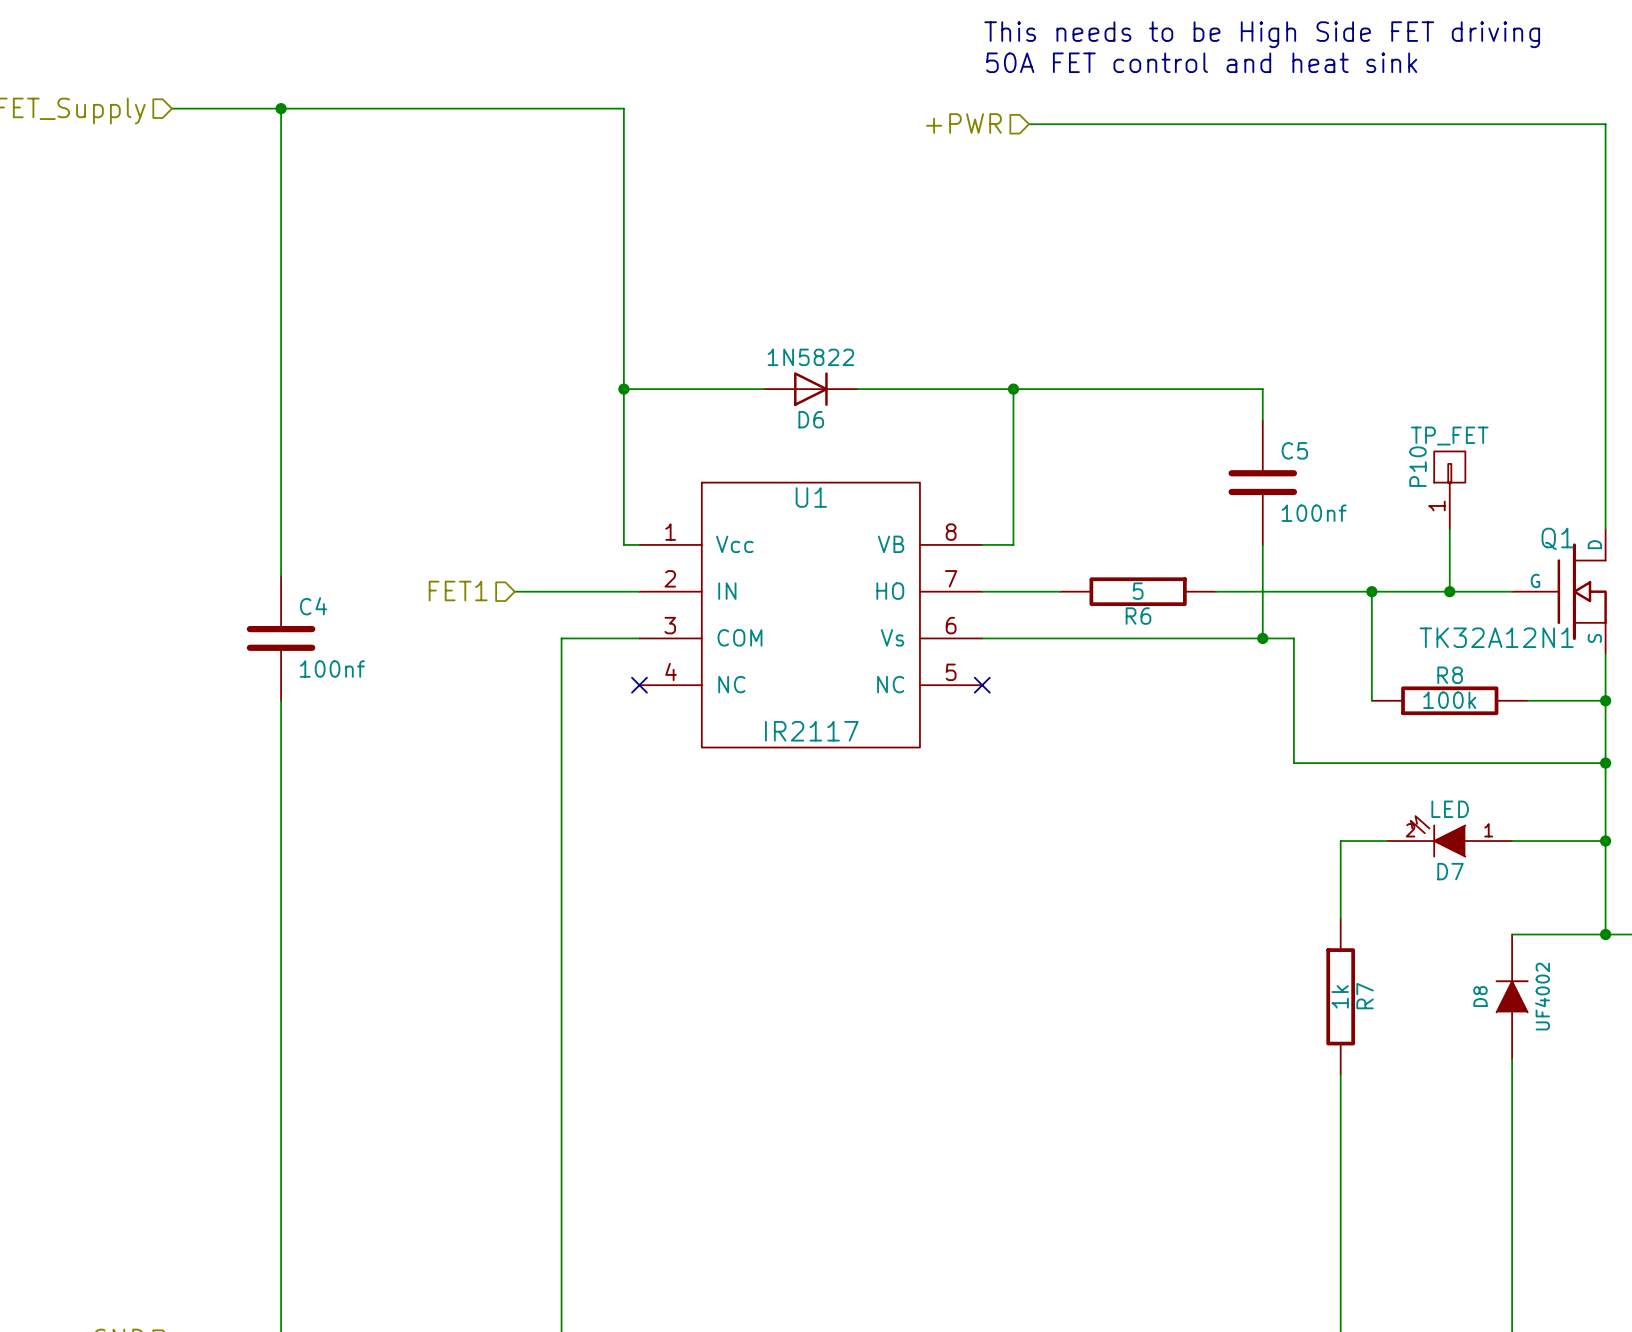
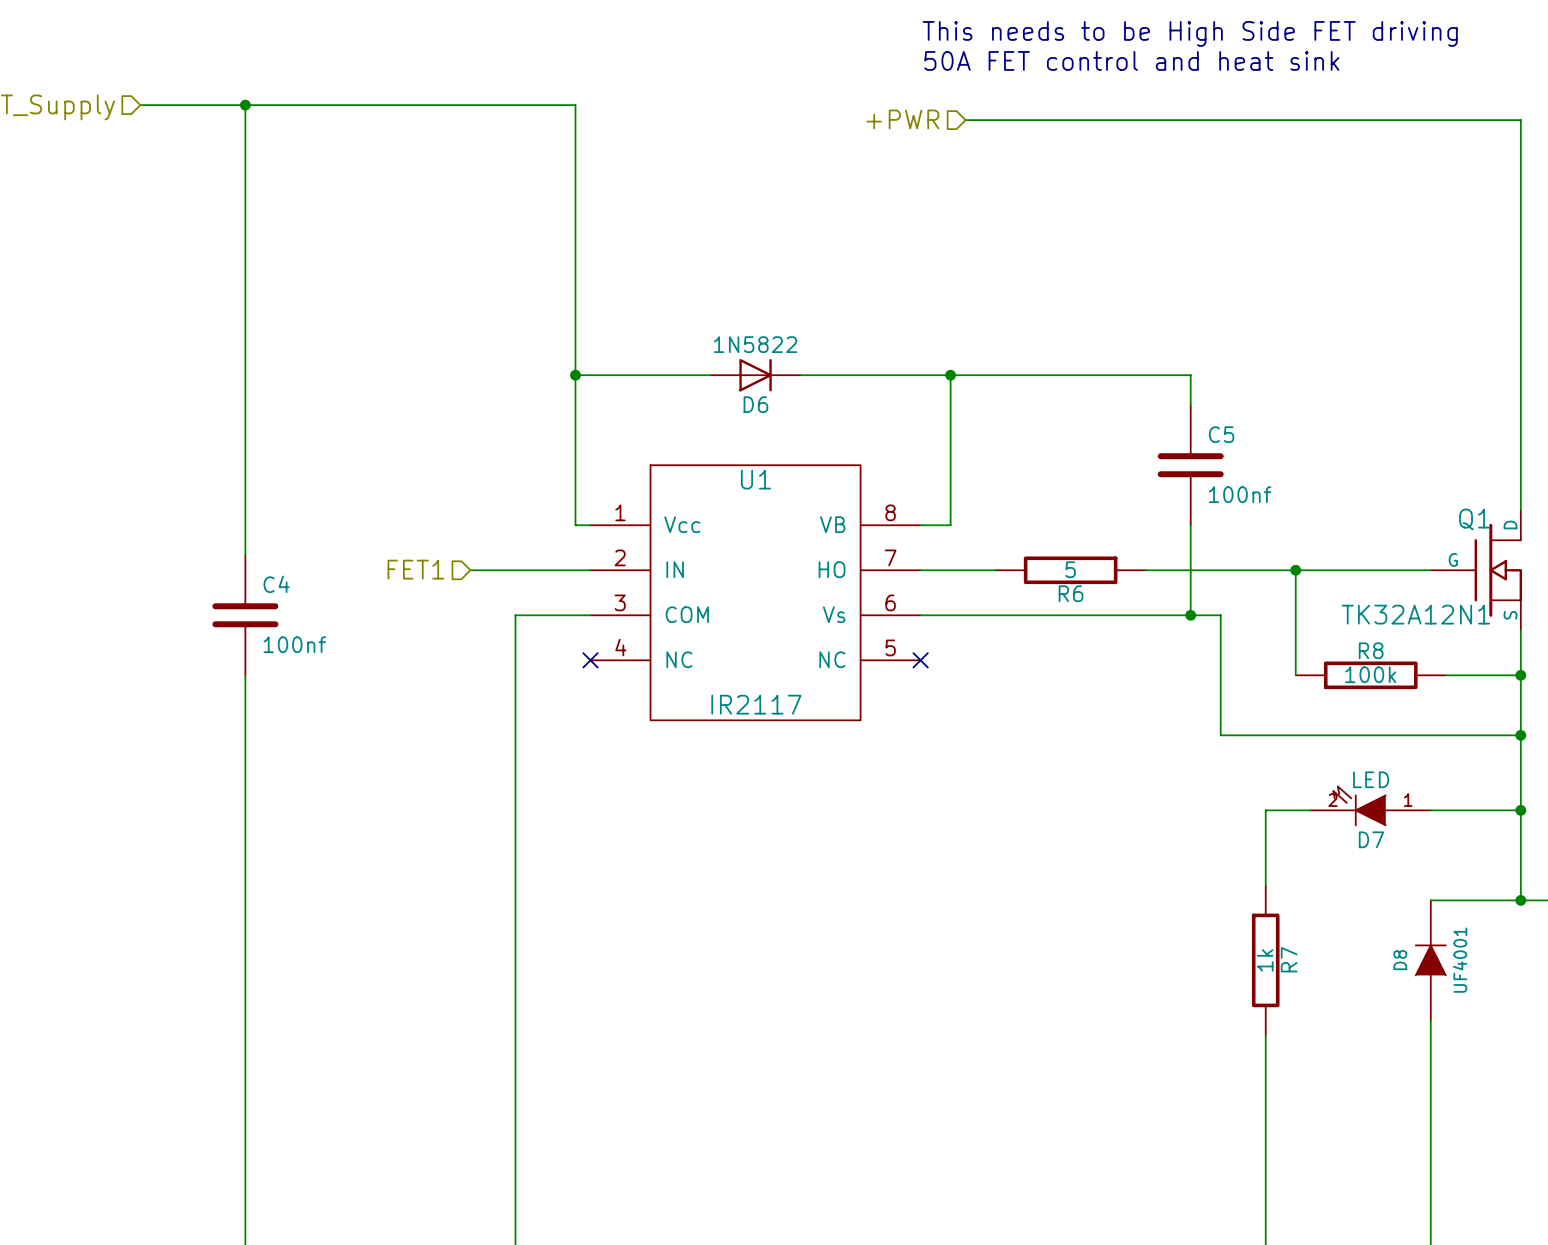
P10: TP_FET (1449, 490) -> none
wire: (1449, 529) (1449, 591) -> none
junction: (1449, 591) -> none
D8 value: UF4002 (1542, 996) -> UF4001 (1460, 960)

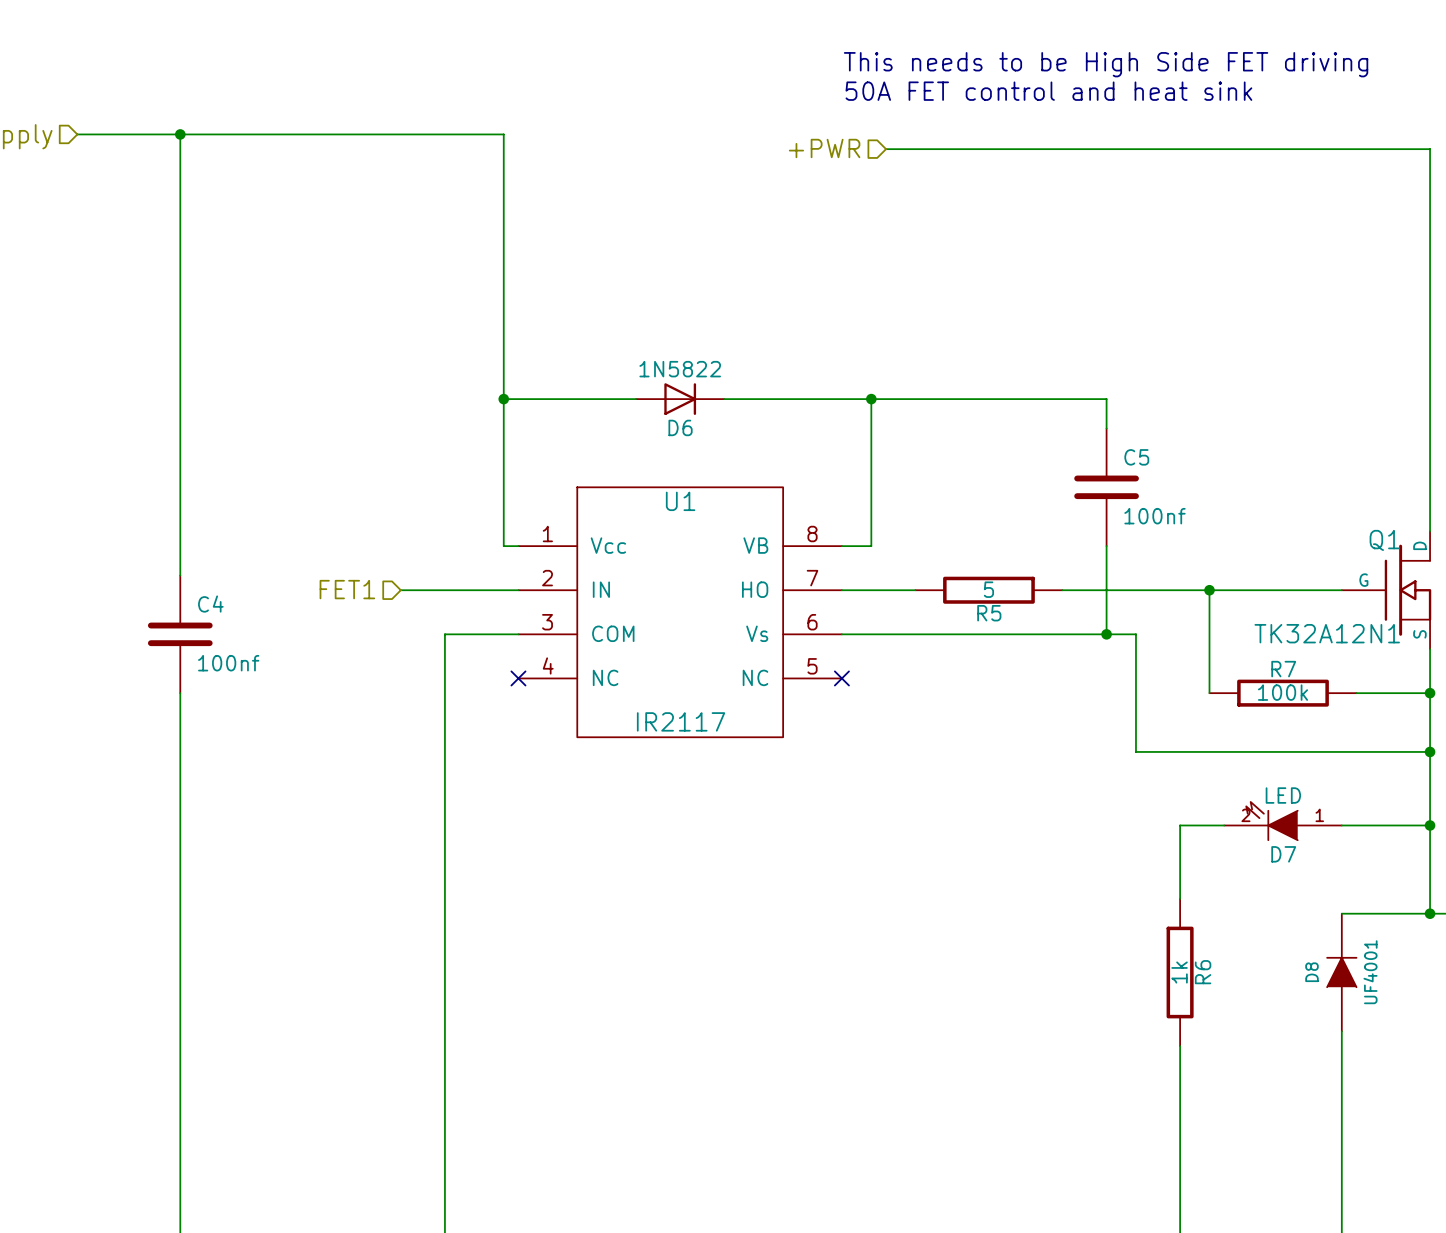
R6 name: R6 (1071, 593) -> R5 (989, 613)
R8 name: R8 (1371, 650) -> R7 (1283, 669)
R7 name: R7 (1289, 959) -> R6 (1203, 972)

